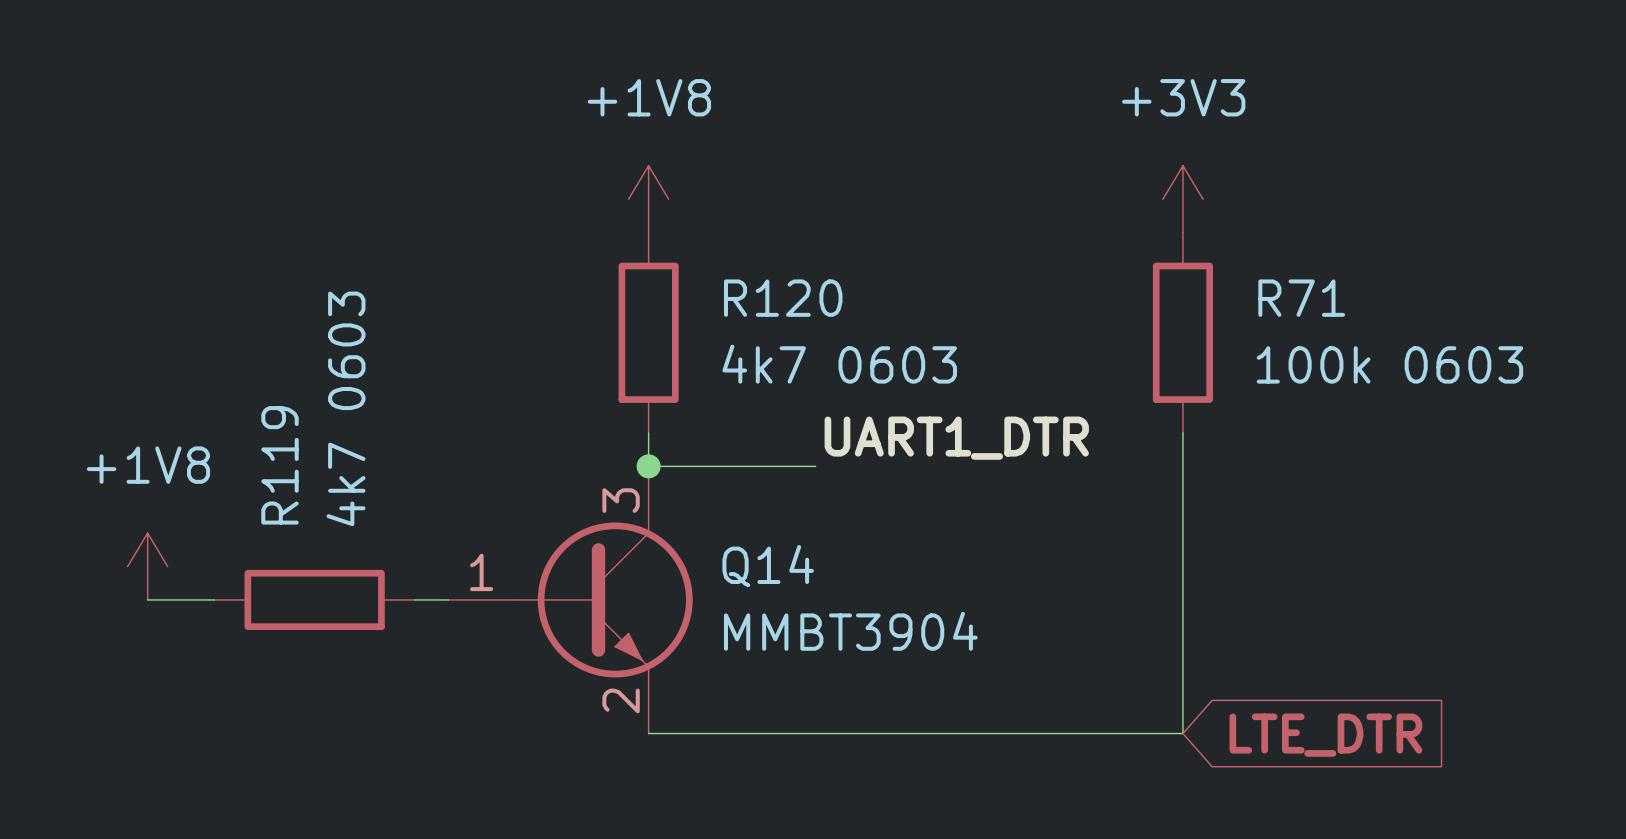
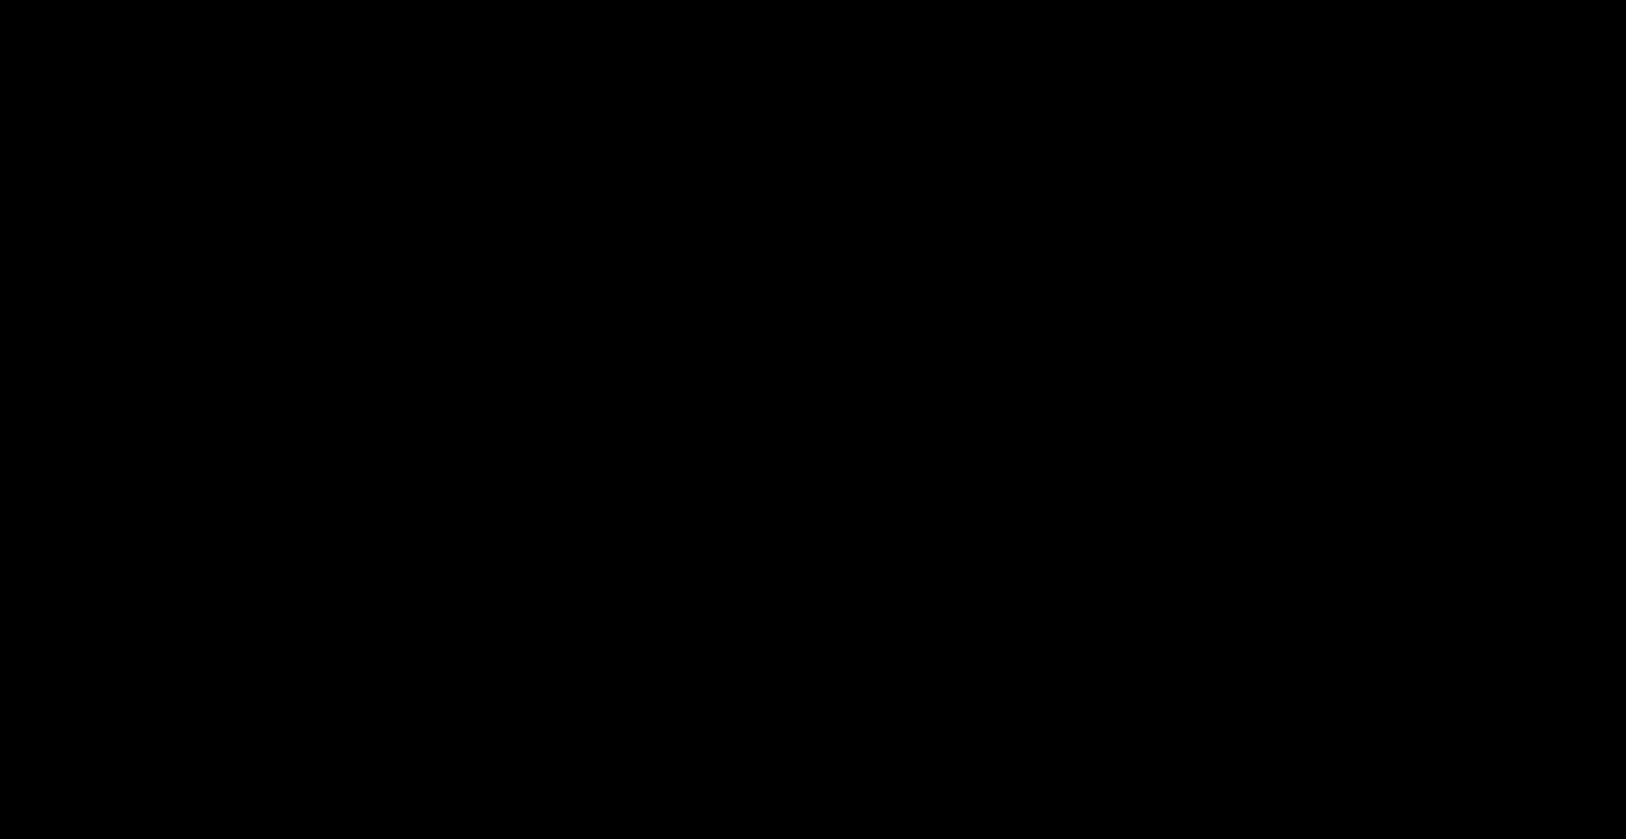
power symbol: +1V8 (648, 199) -> none
power symbol: +3V3 (1182, 199) -> none
R120: 4k7 0603 (648, 332) -> none
R71: 100k 0603 (1182, 332) -> none
wire: (648, 432) (648, 466) (815, 466) -> none
wire: (1182, 432) (1182, 733) (648, 733) -> none
label: UART1_DTR (956, 438) -> none
junction: (648, 466) -> none
power symbol: +1V8 (147, 566) -> none
wire: (147, 599) (214, 599) -> none
R119: 4k7 0603 (314, 599) -> none
wire: (414, 599) (448, 599) -> none
Q14: MMBT3904 (570, 599) -> none
global label: LTE_DTR (1325, 735) -> none

